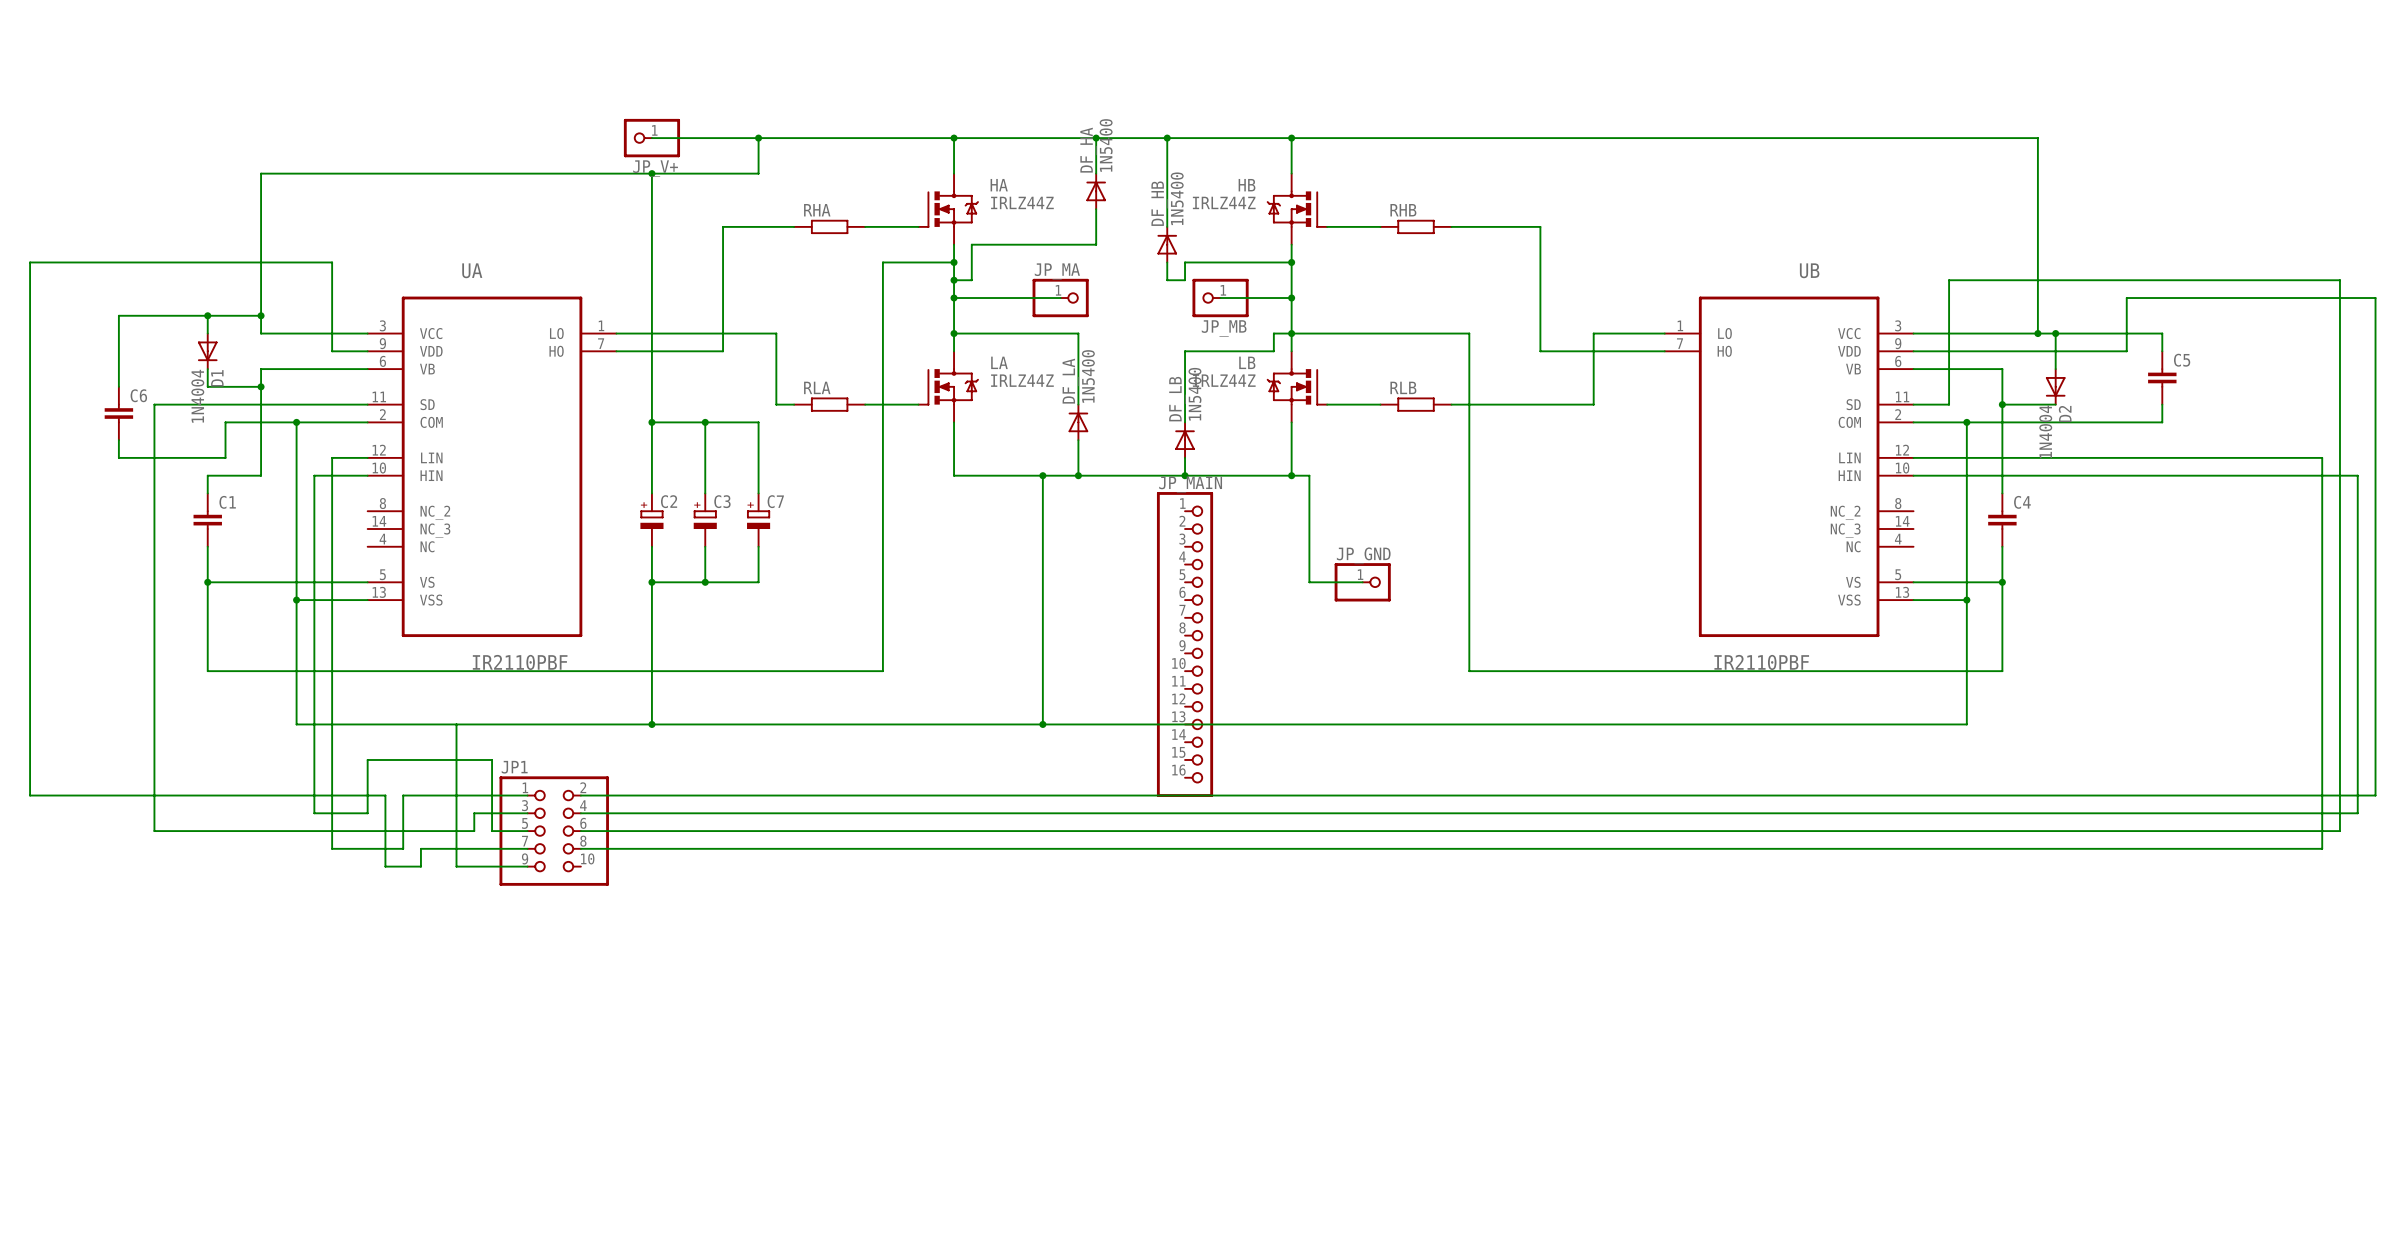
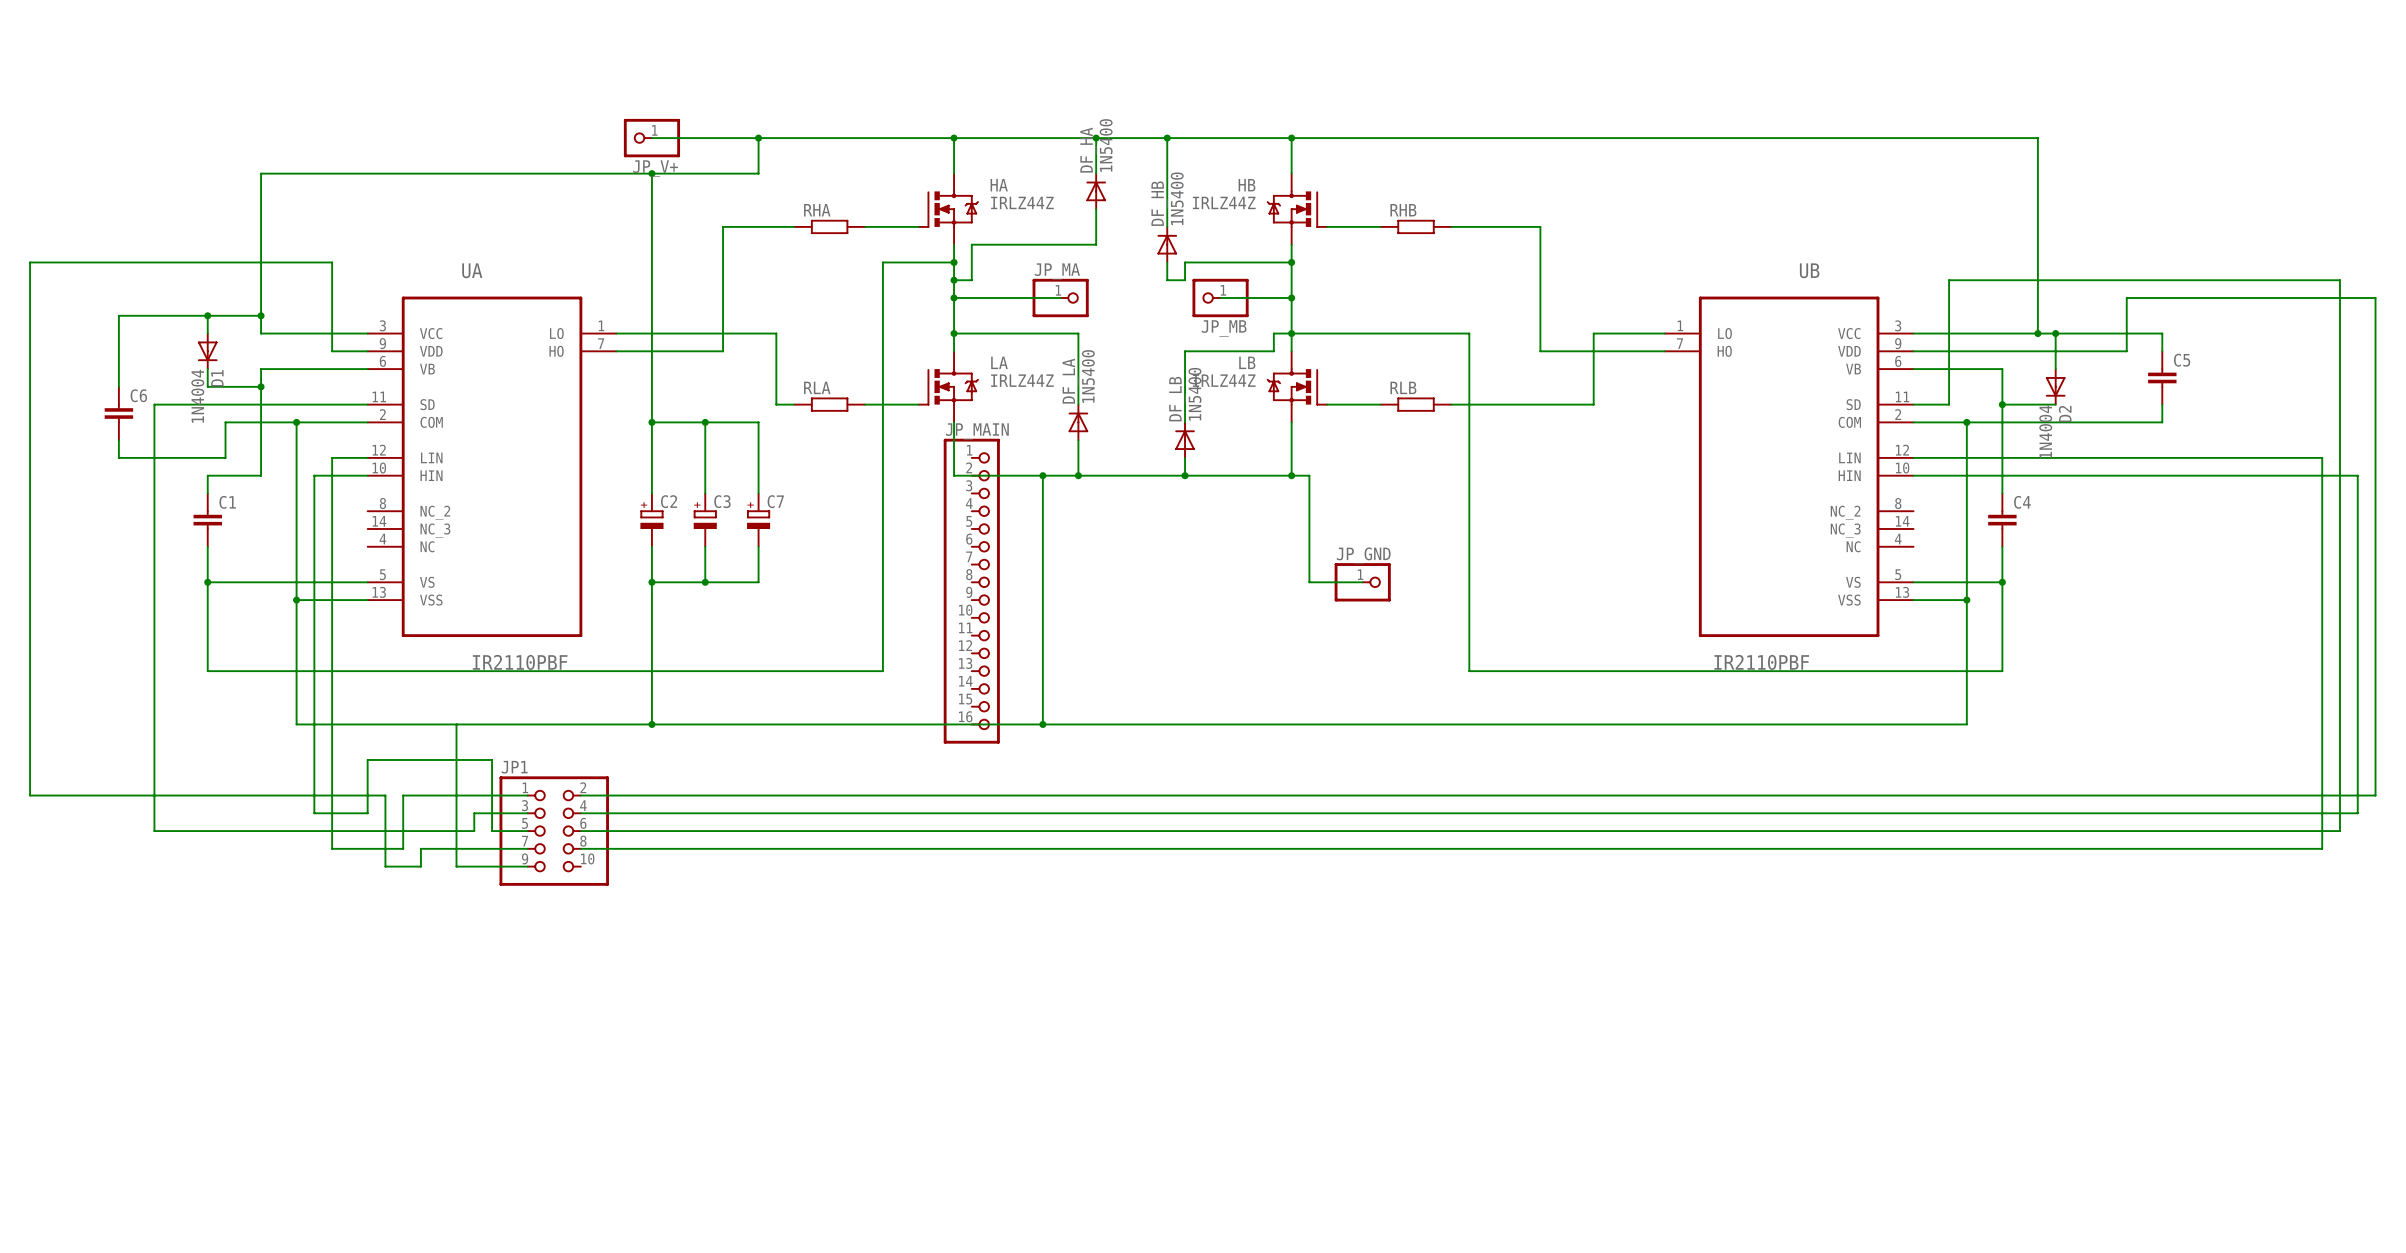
JP_MAIN: none -> (971, 591)
JP_MAIN: (1185, 644) -> none

